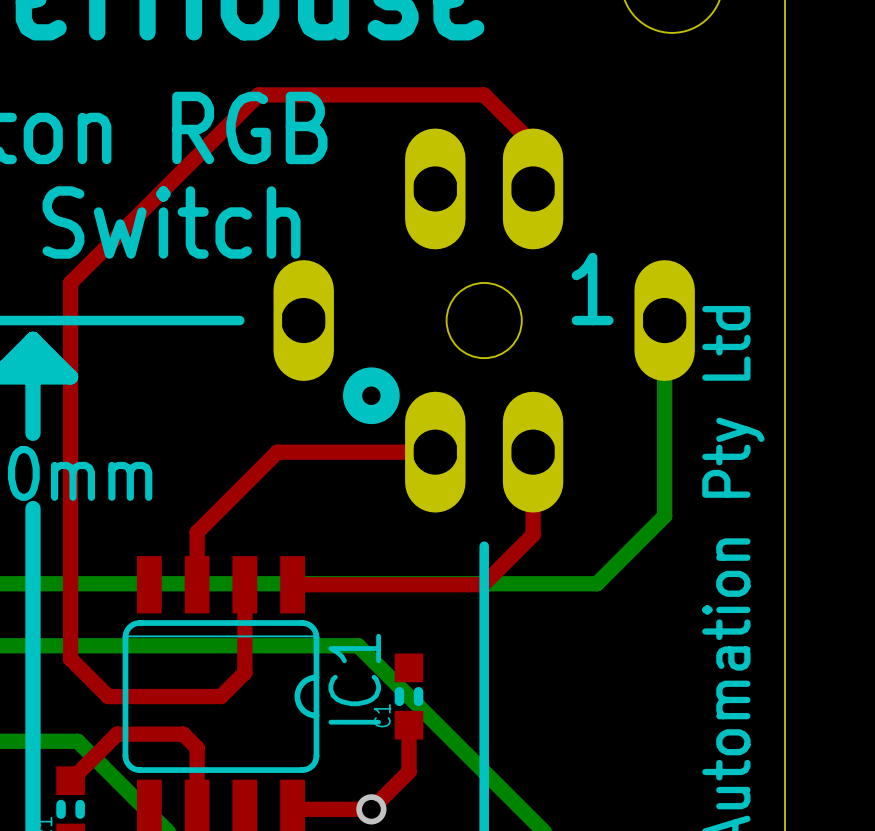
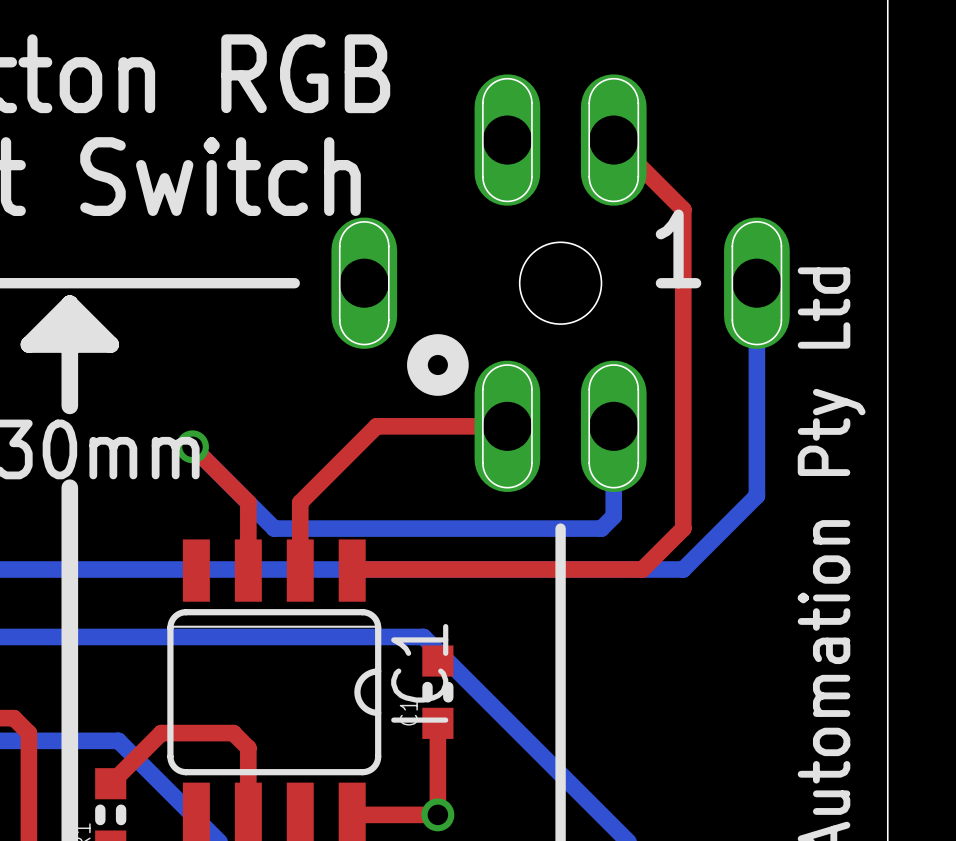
top track: (533, 188) (533, 143) (484, 94) (258, 94) (70, 282) (70, 658) (108, 696) (220, 696) (244, 672) (244, 584) -> (613, 140) (683, 209) (683, 528) (642, 569) (352, 570)
top track: (314, 452) (277, 452) (197, 532) -> (376, 426) (300, 502) (300, 570)
bottom track: none -> (613, 426) (613, 516) (601, 528) (274, 528) (192, 446)
top track: (533, 452) (533, 534) (483, 584) (292, 584) -> none
top track: none -> (192, 446) (248, 502) (248, 513)
via: none -> (192, 446)
C1 position: (408, 696) -> (437, 692)
top track: (408, 725) (408, 771) (371, 809) -> (437, 723) (437, 814)

